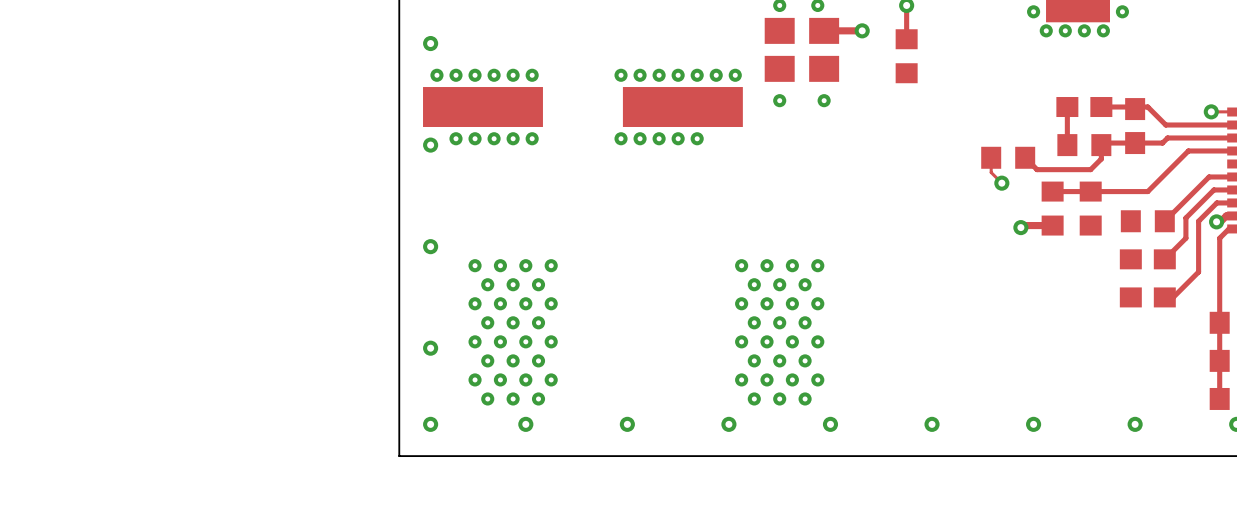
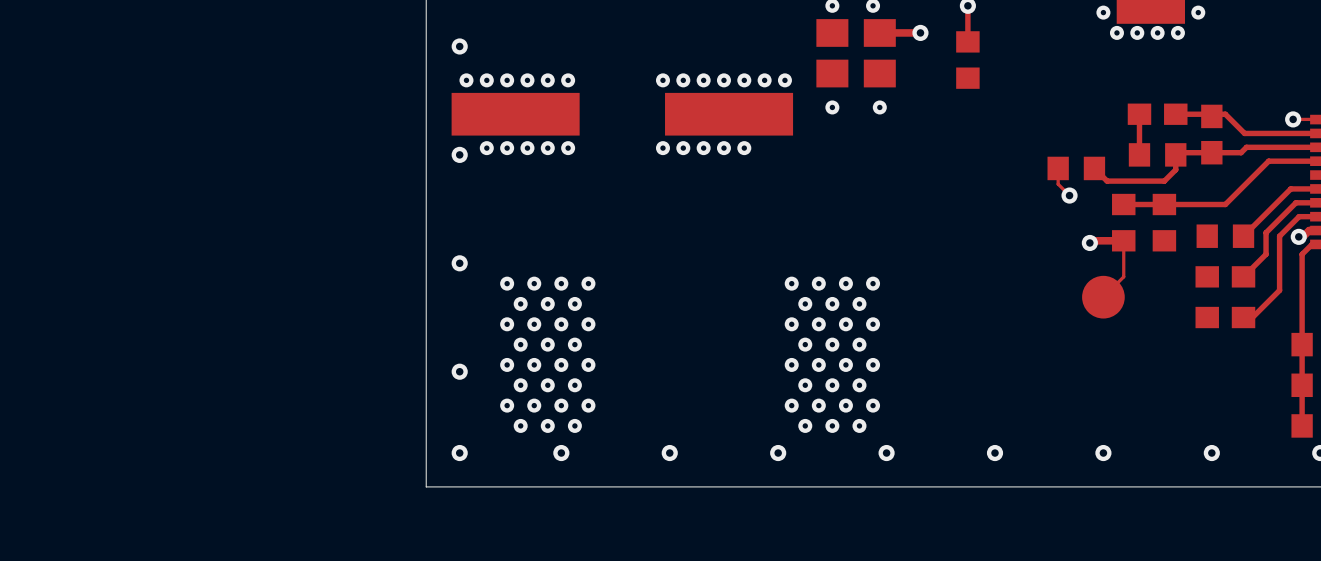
top track: none -> (1123, 240) (1123, 276) (1103, 297)
part: none -> (1103, 297)

